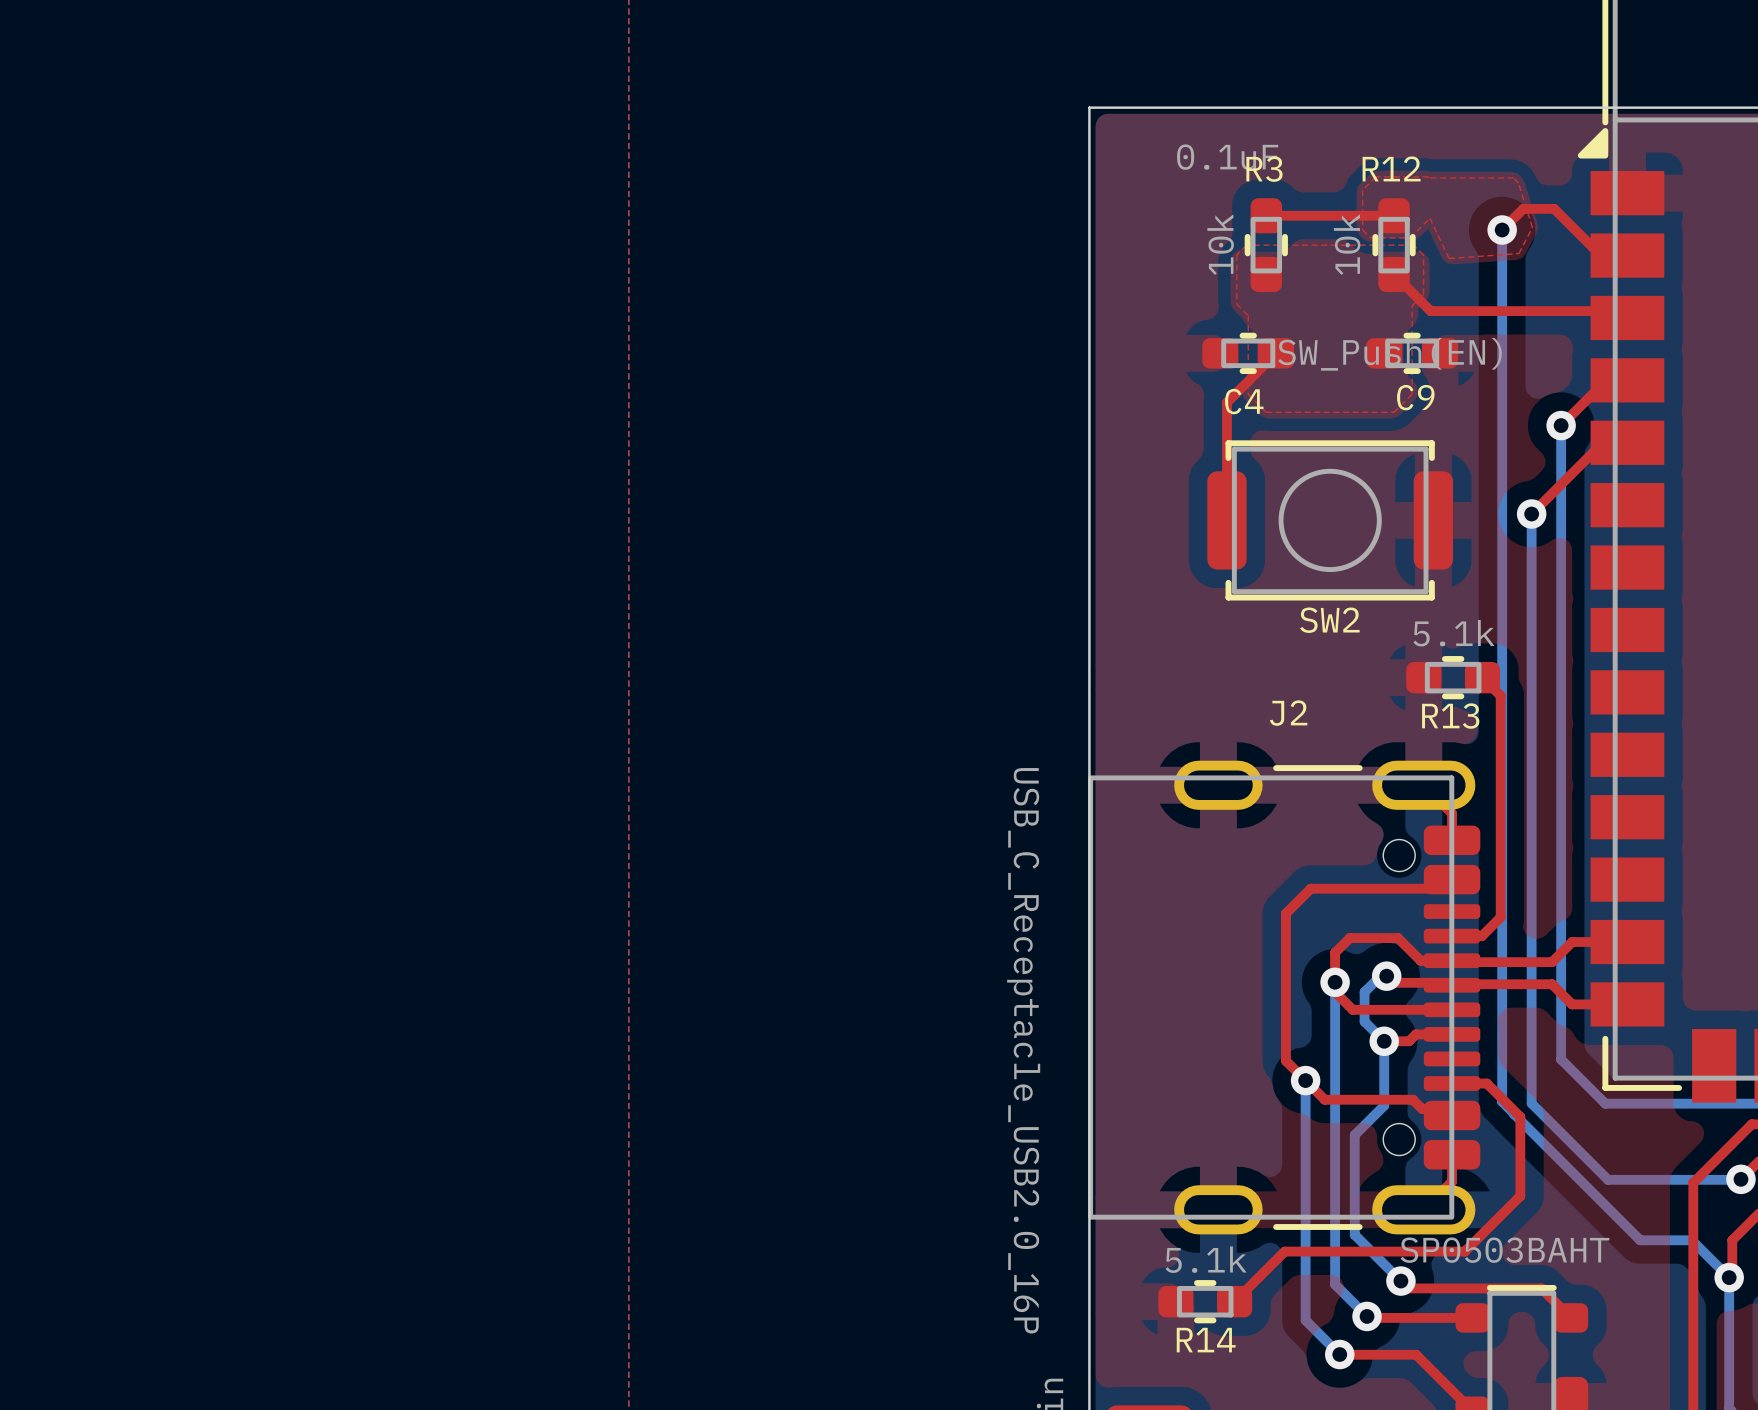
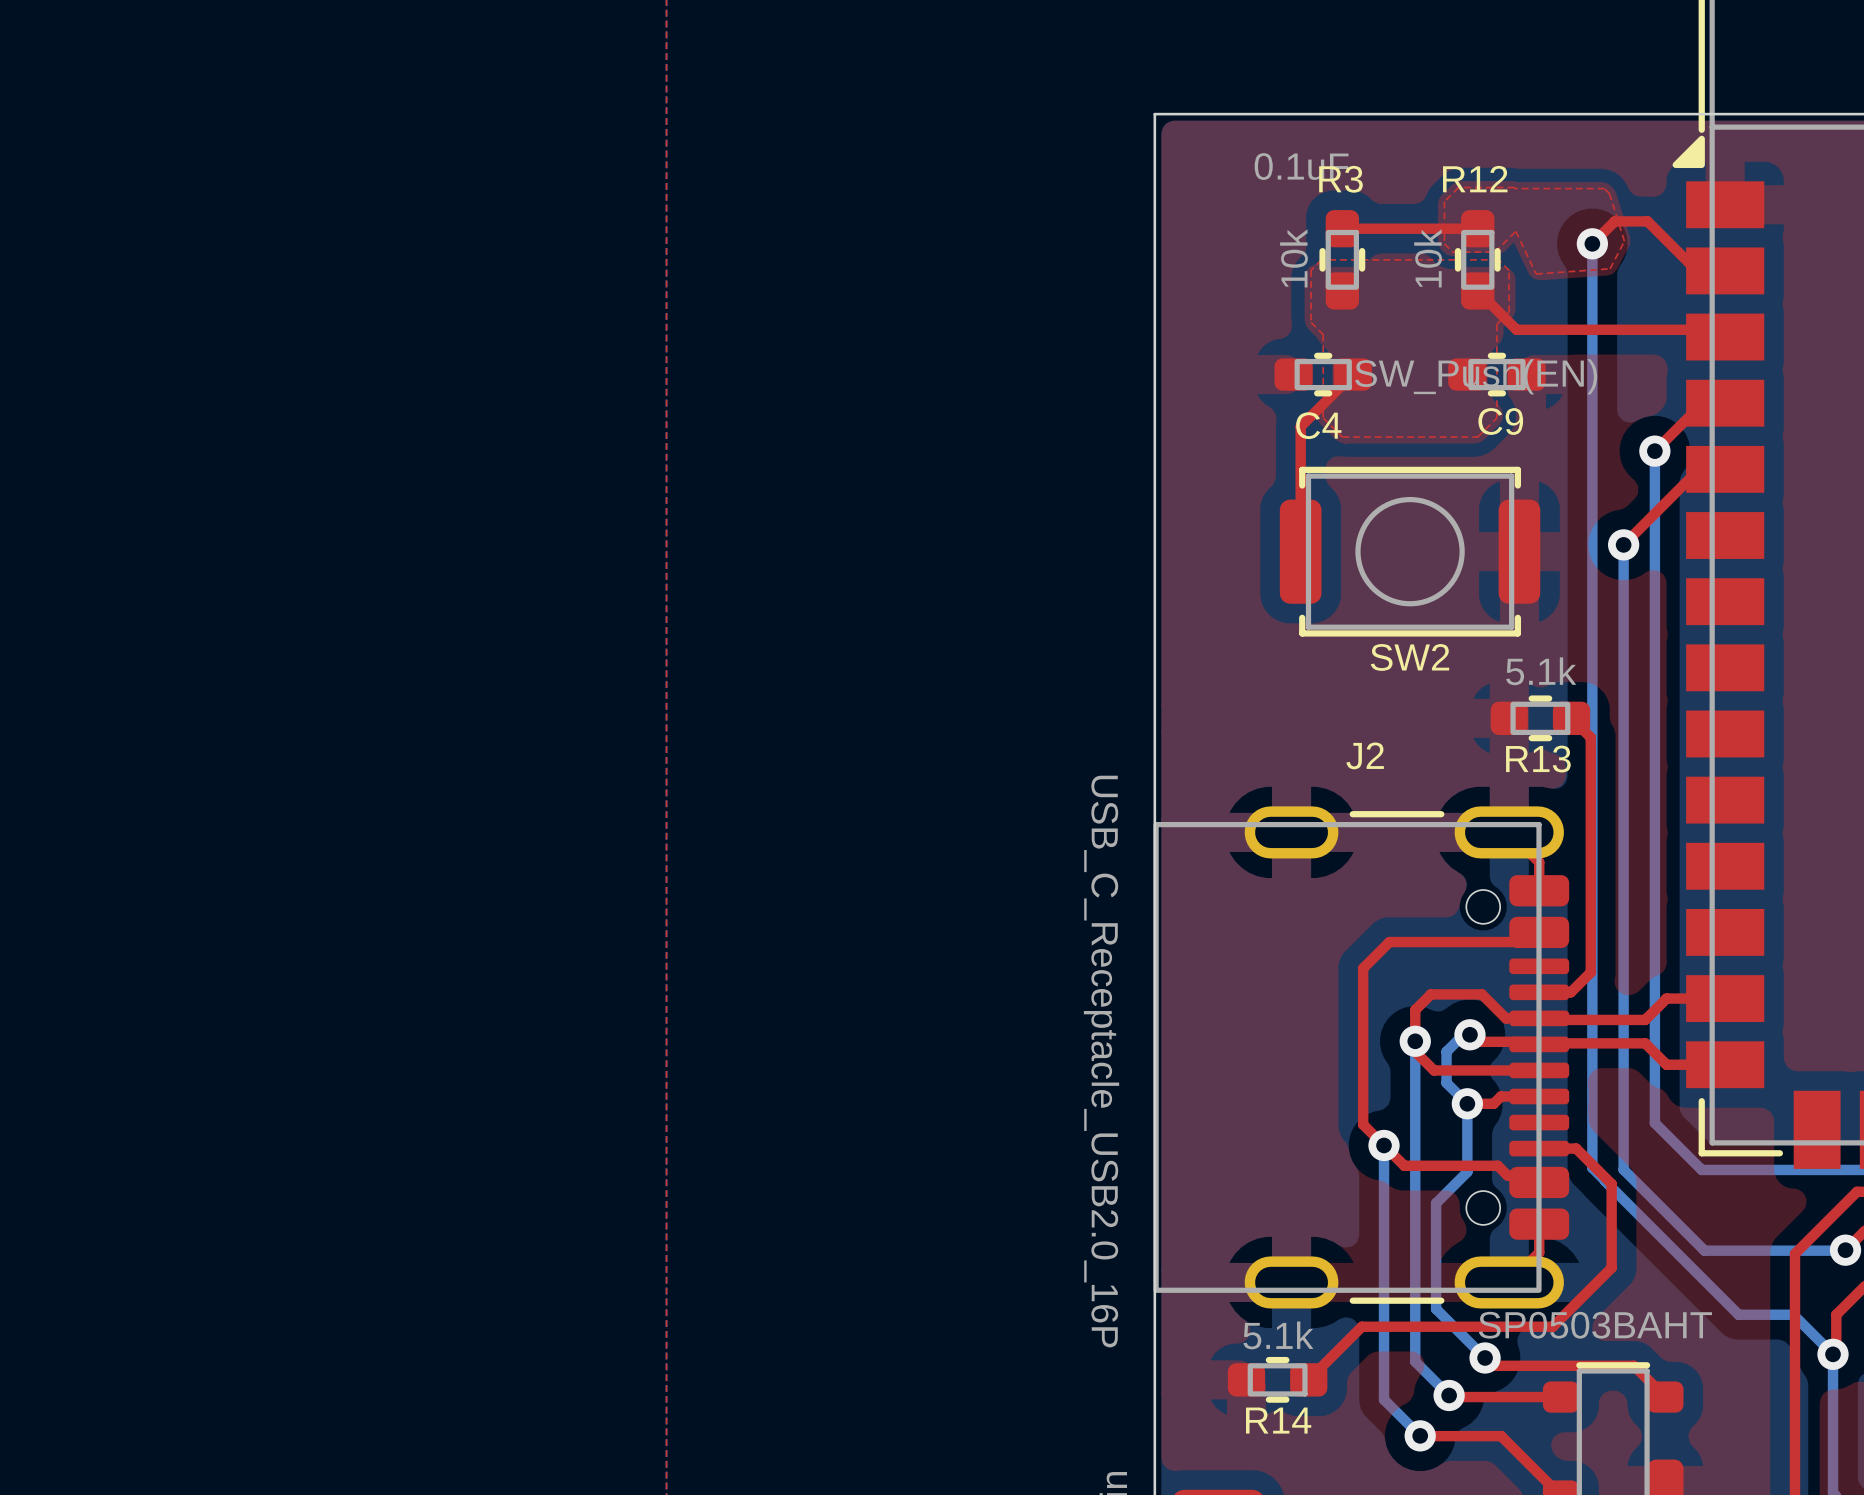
J2 value position: USB_C_Receptacle_USB2.0_16P (1023, 1050) -> USB_C_Receptacle_USB2.0_16P (1101, 1061)

